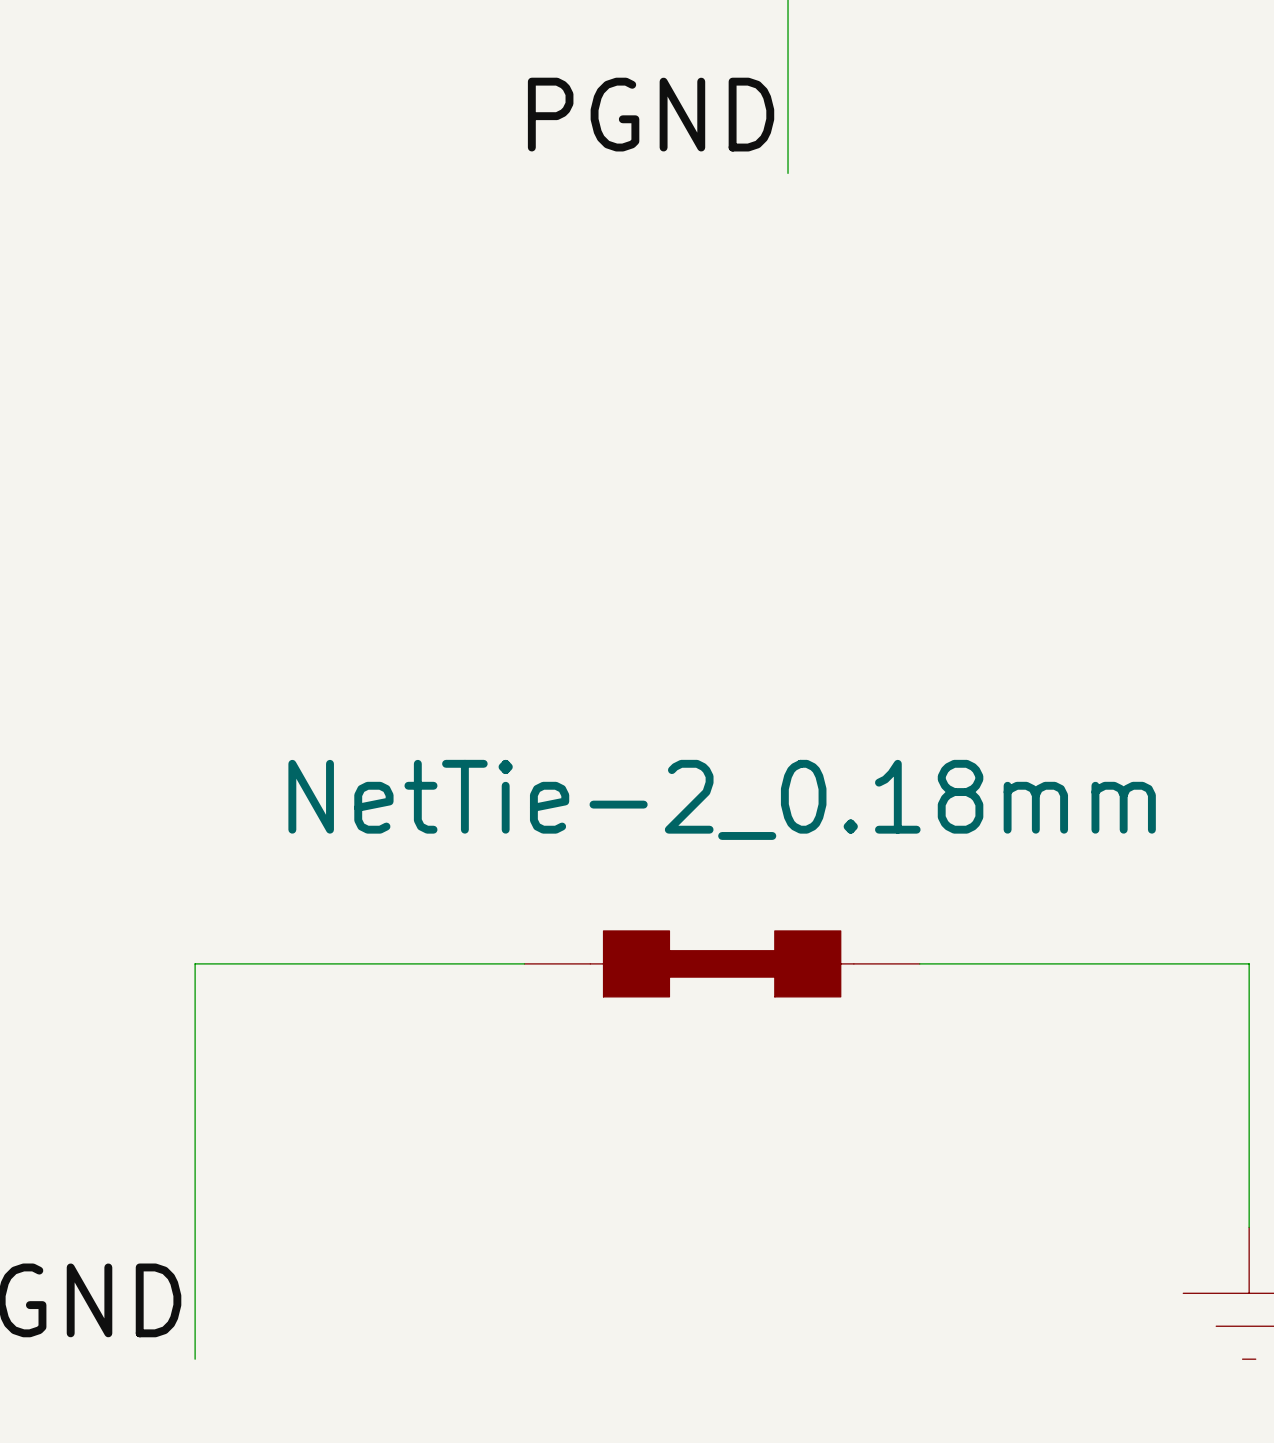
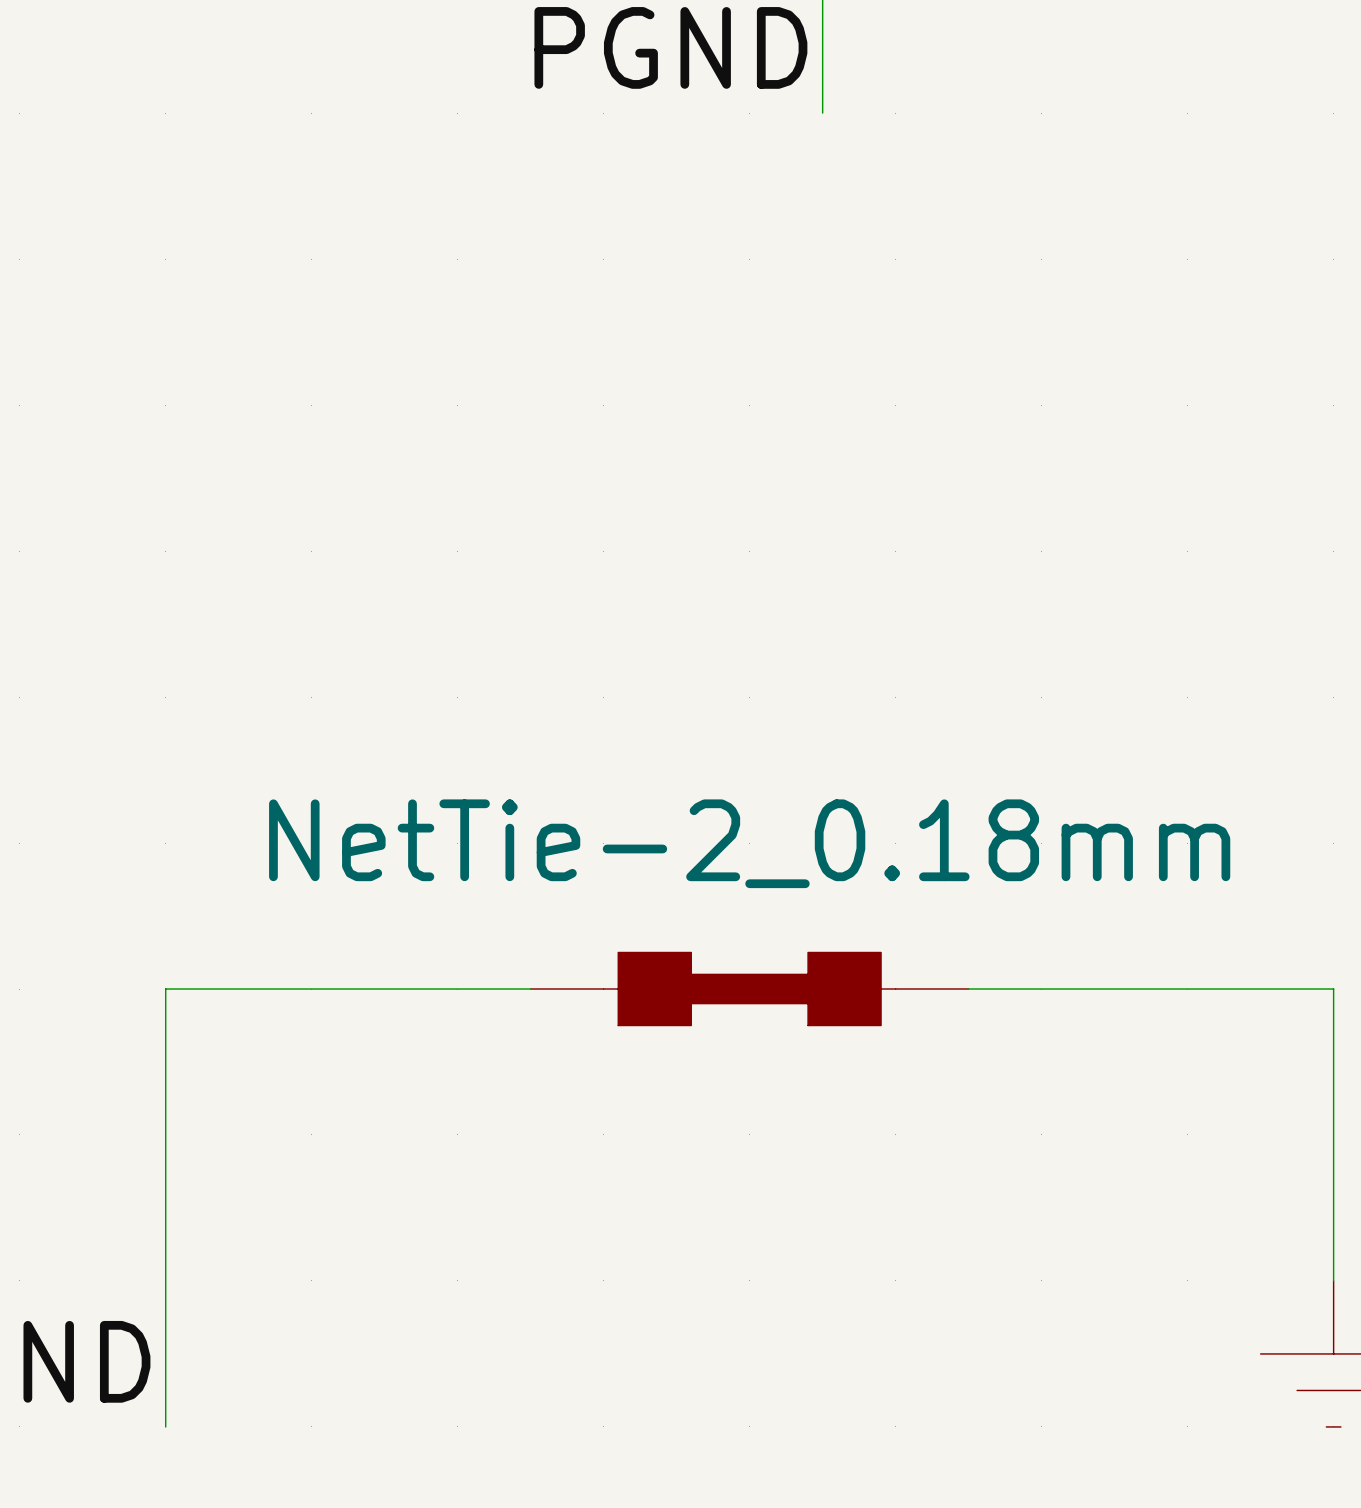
part value position: NetTie-2_0.18mm (722, 799) -> NetTie-2_0.18mm (749, 843)

